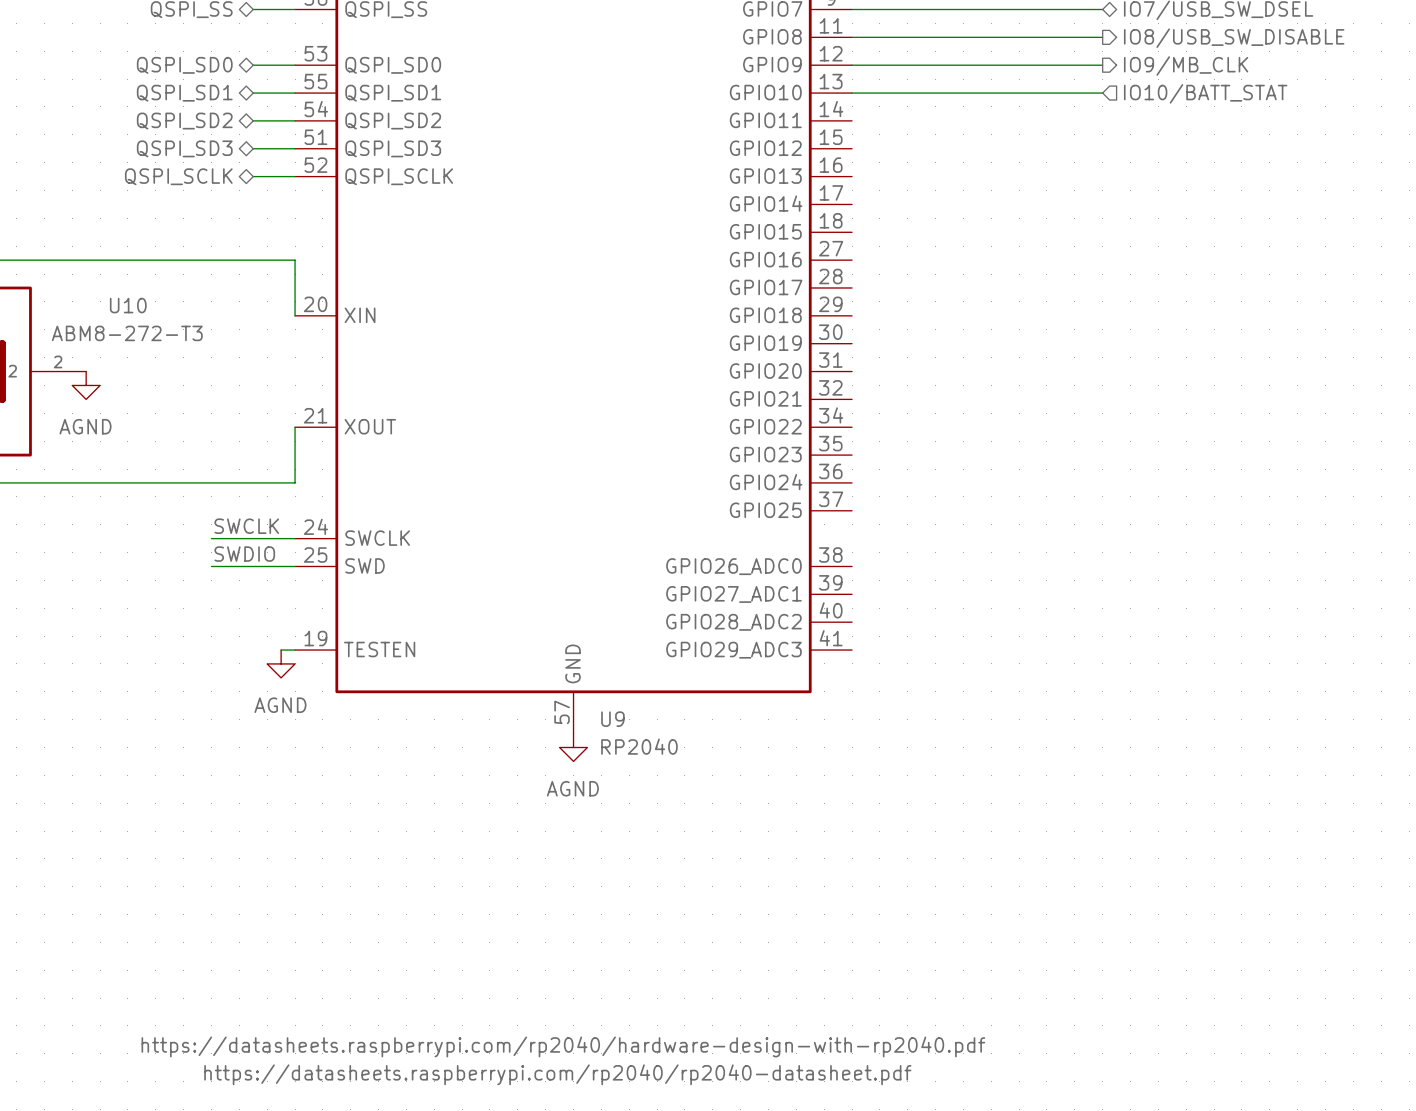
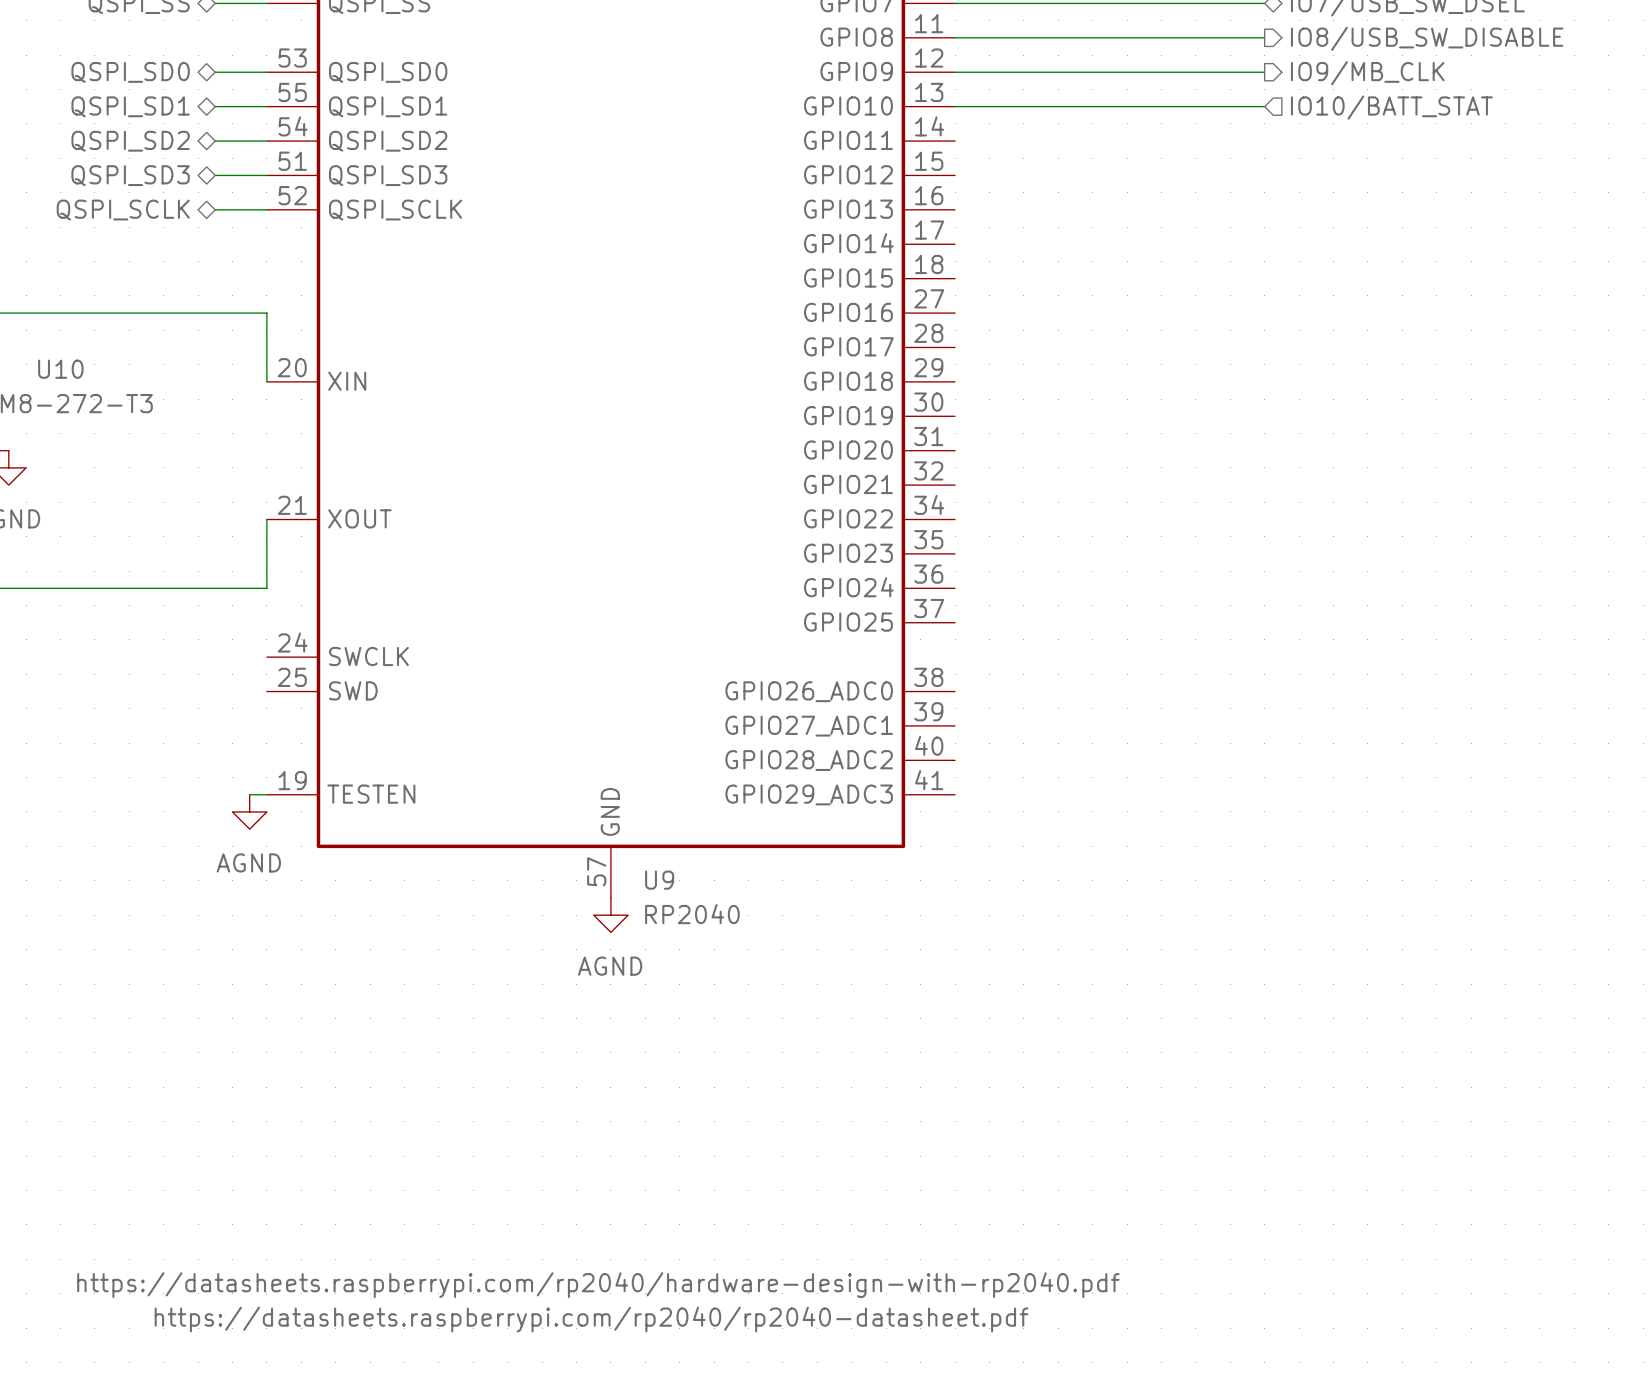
label: SWCLK (246, 526) -> none
wire: (211, 538) (295, 538) -> none
label: SWDIO (244, 554) -> none
wire: (211, 566) (295, 566) -> none

